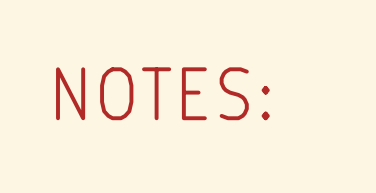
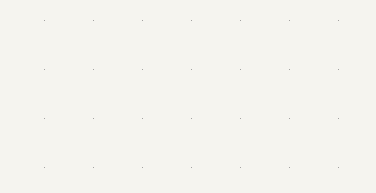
text: NOTES: (162, 93) -> none

